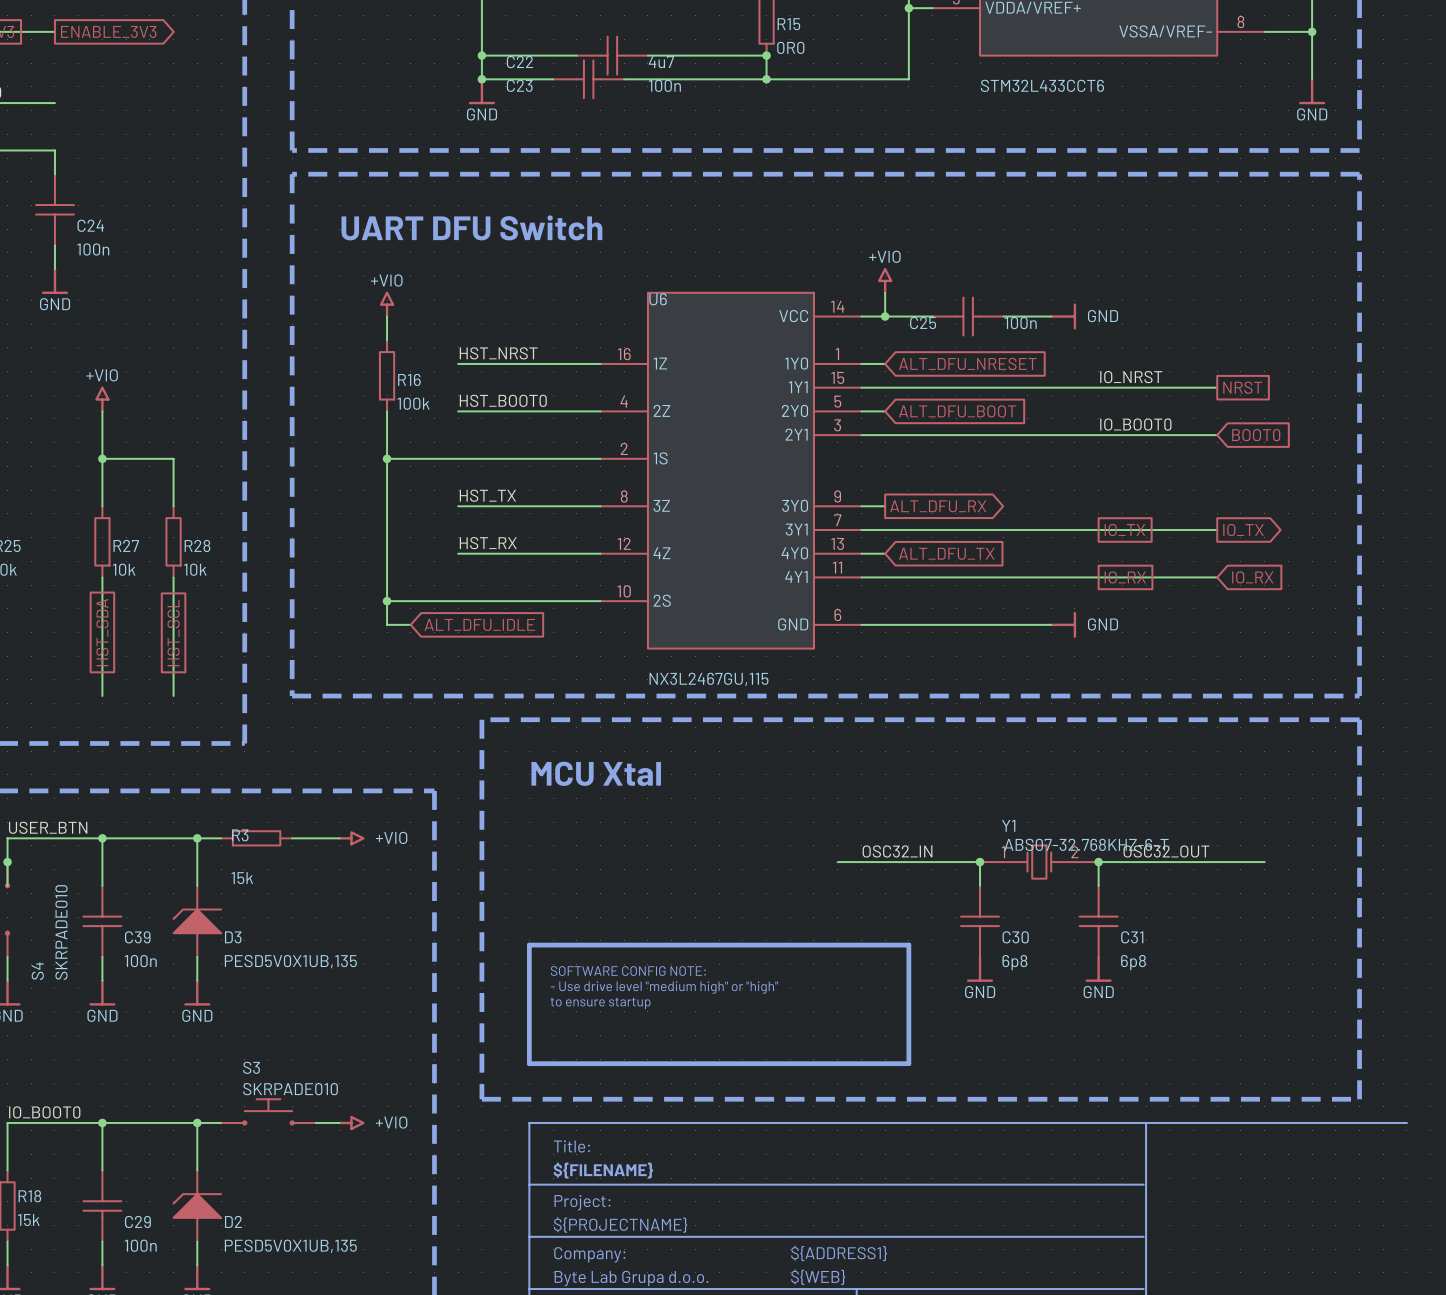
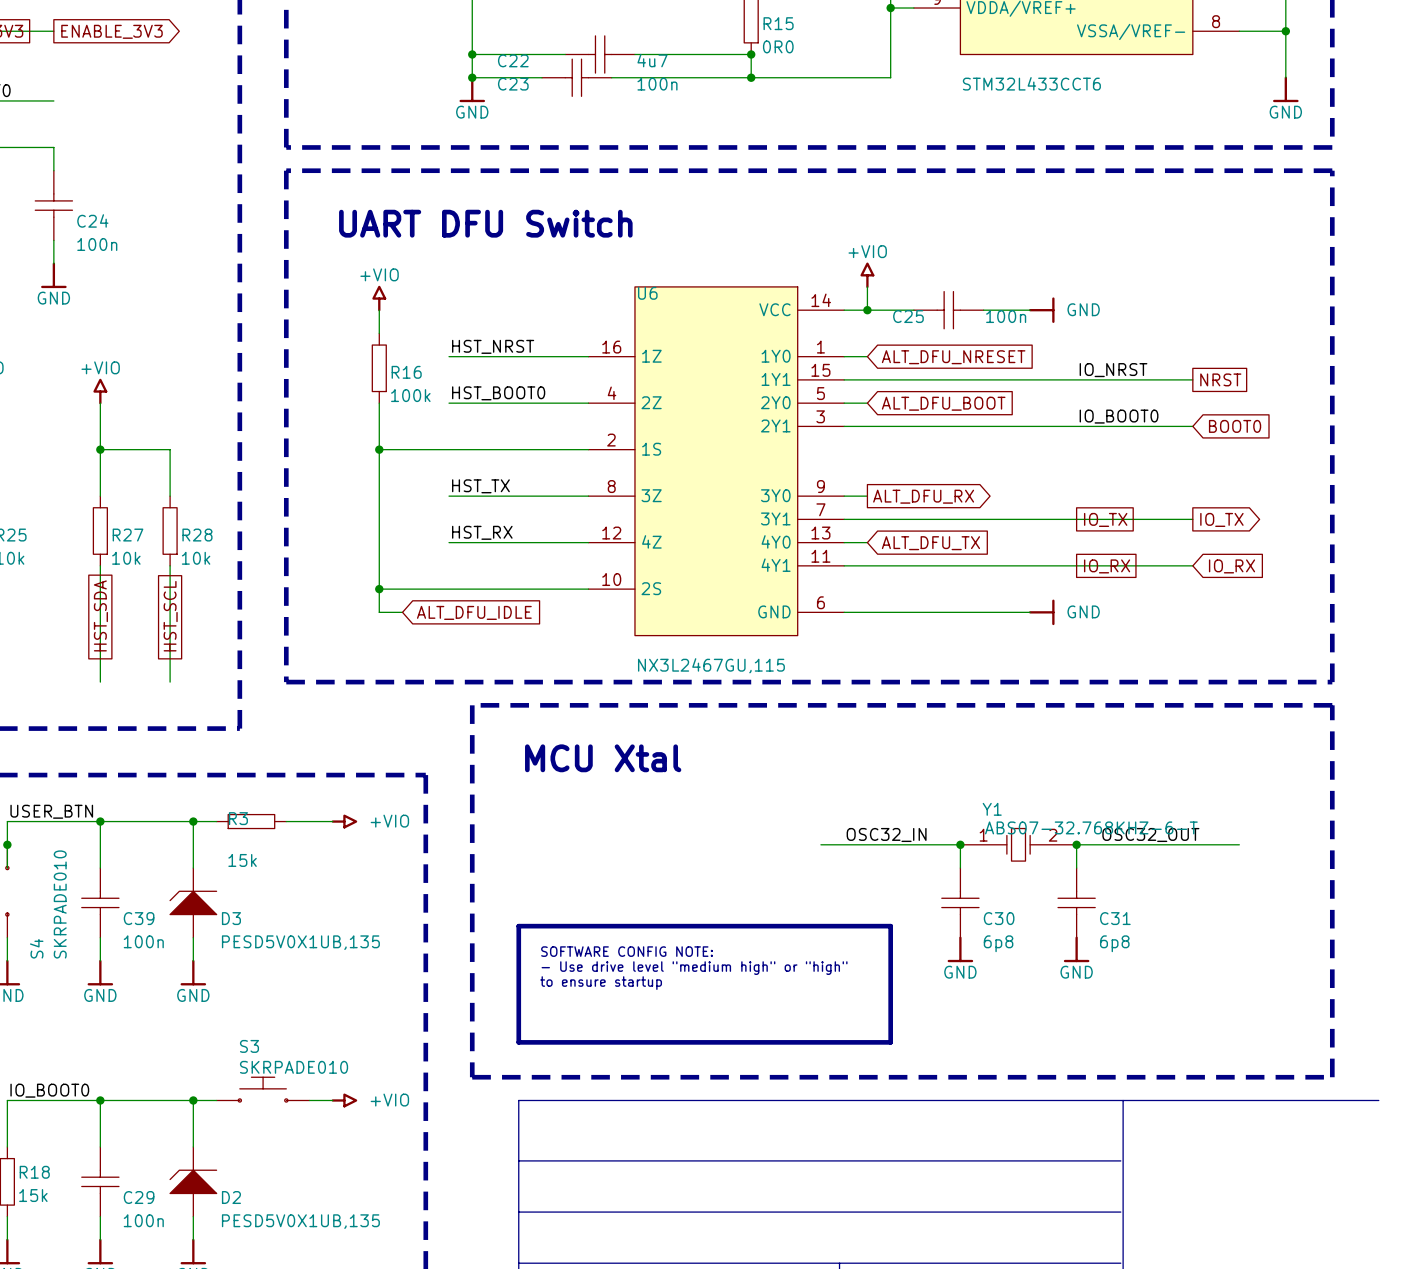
text: Title: (571, 1146) -> none
text: ${FILENAME} (603, 1170) -> none
text: Project: (582, 1202) -> none
text: ${PROJECTNAME} (620, 1224) -> none
text: ${ADDRESS1} (839, 1253) -> none
text: Company: (589, 1254) -> none
text: ${WEB} (818, 1277) -> none
text: Byte Lab Grupa d.o.o. (631, 1278) -> none

